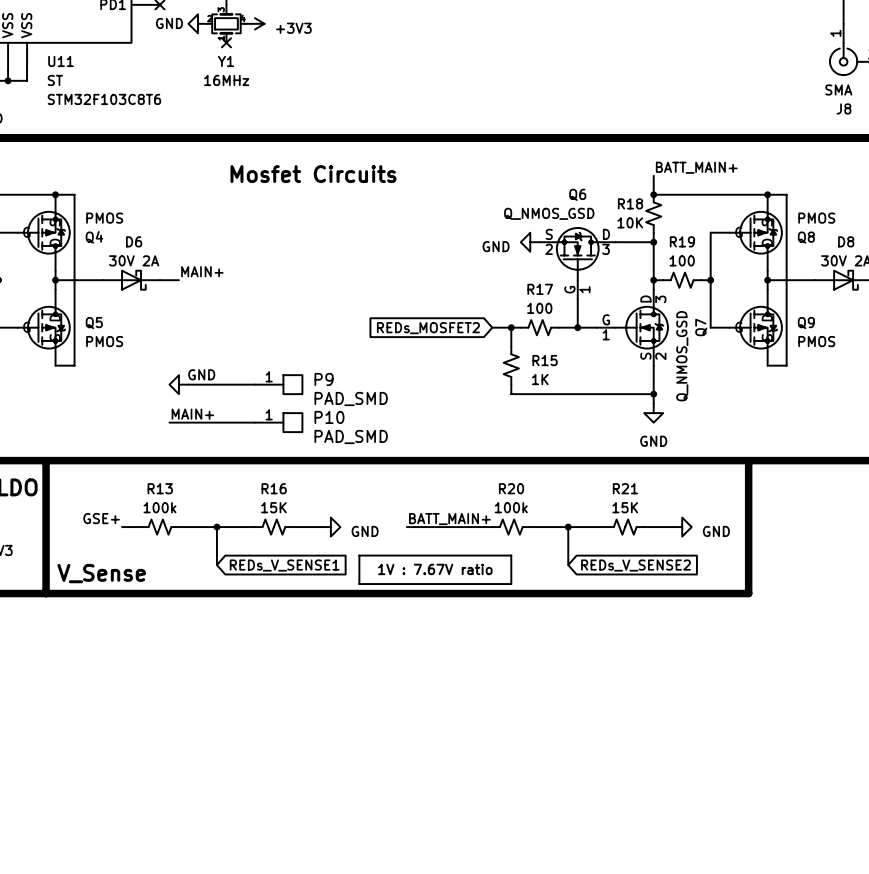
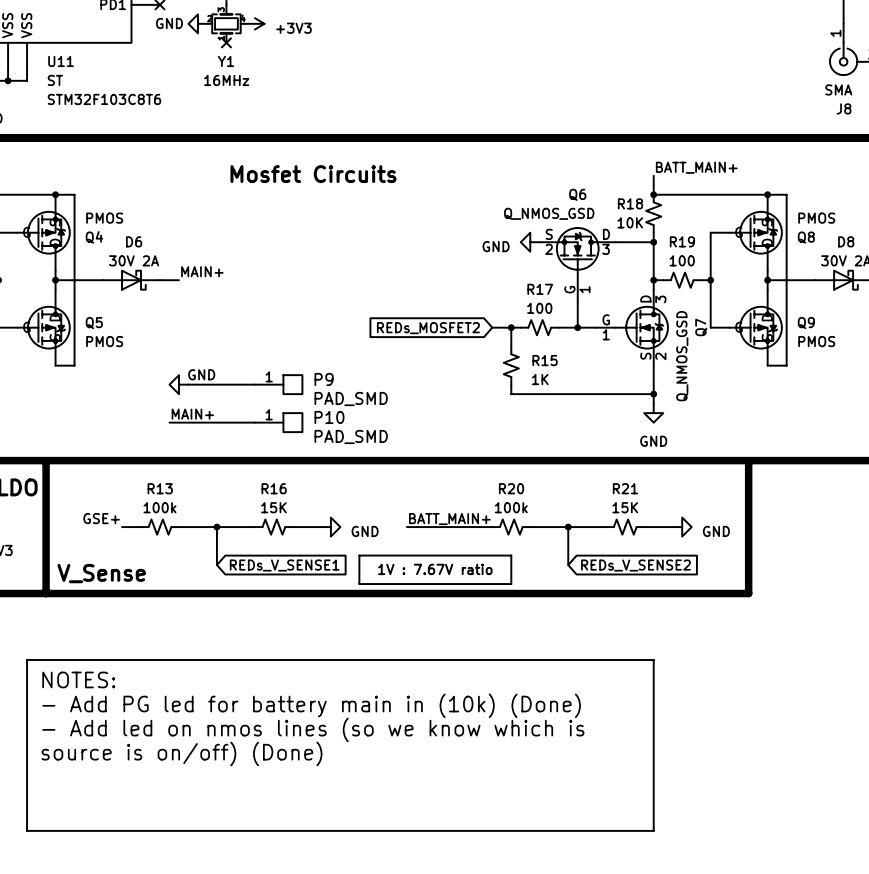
line: none -> (27, 659) (653, 659) (653, 830) (27, 830) (27, 659)
text: none -> NOTES: (78, 679)
text: none -> - Add PG led for battery main in (10k) (Done) (311, 705)
text: none -> - Add led on nmos lines (so we know which is (313, 729)
text: none -> source is on/off) (Done) (182, 753)

